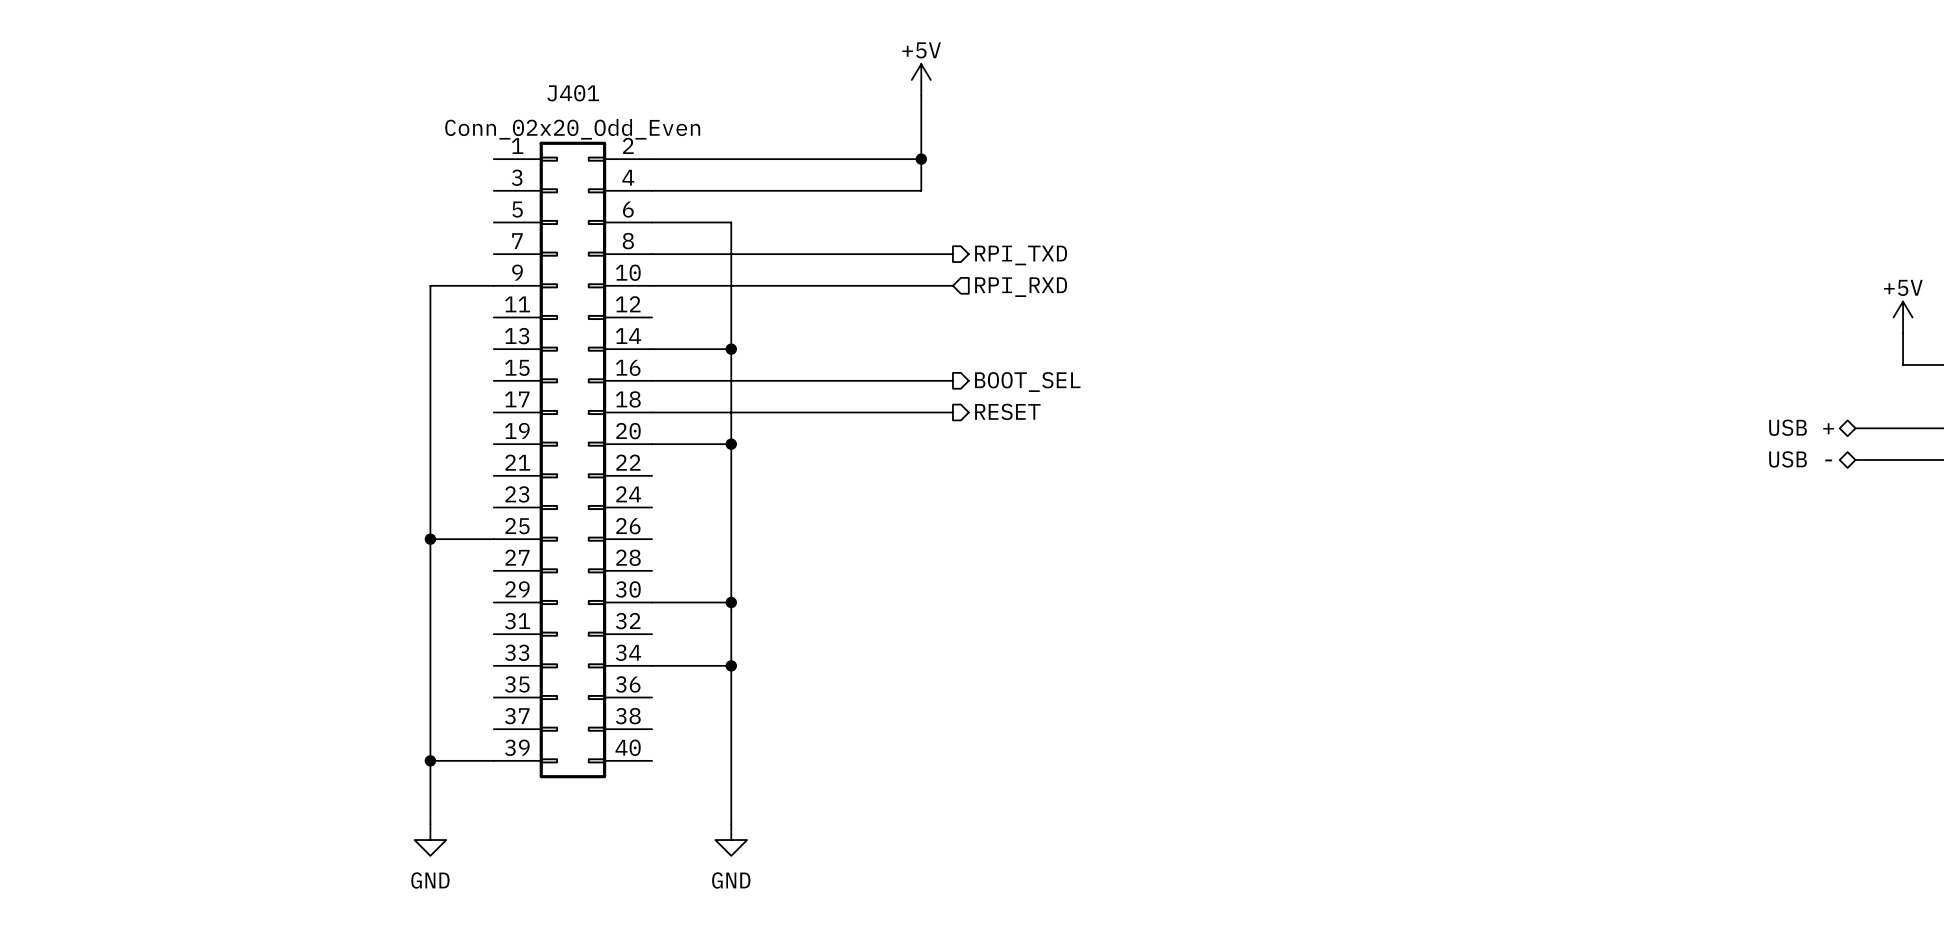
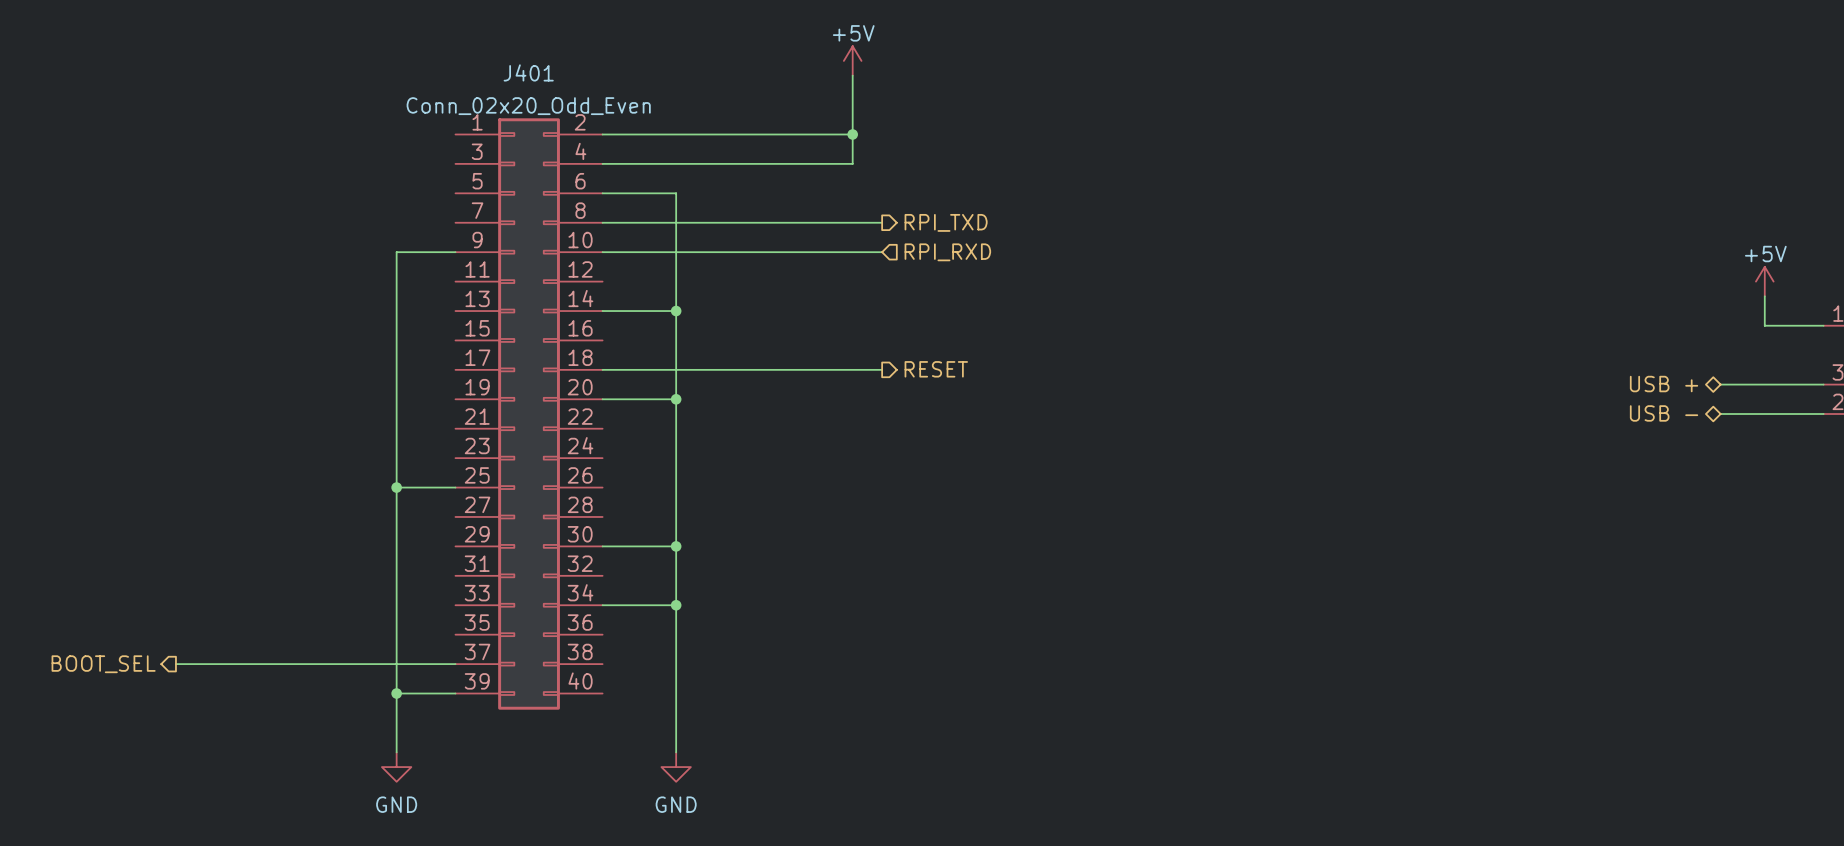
wire: (652, 380) (952, 380) -> none
hierarchical label: BOOT_SEL (1027, 382) -> none
wire: none -> (175, 664) (455, 664)
hierarchical label: none -> BOOT_SEL (103, 664)

